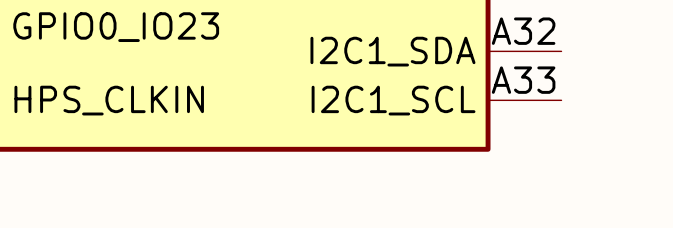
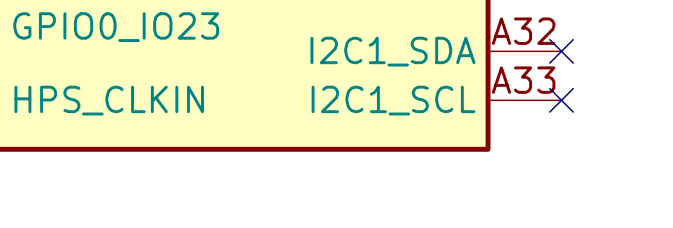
no-connect mark: none -> (561, 51)
no-connect mark: none -> (561, 100)

